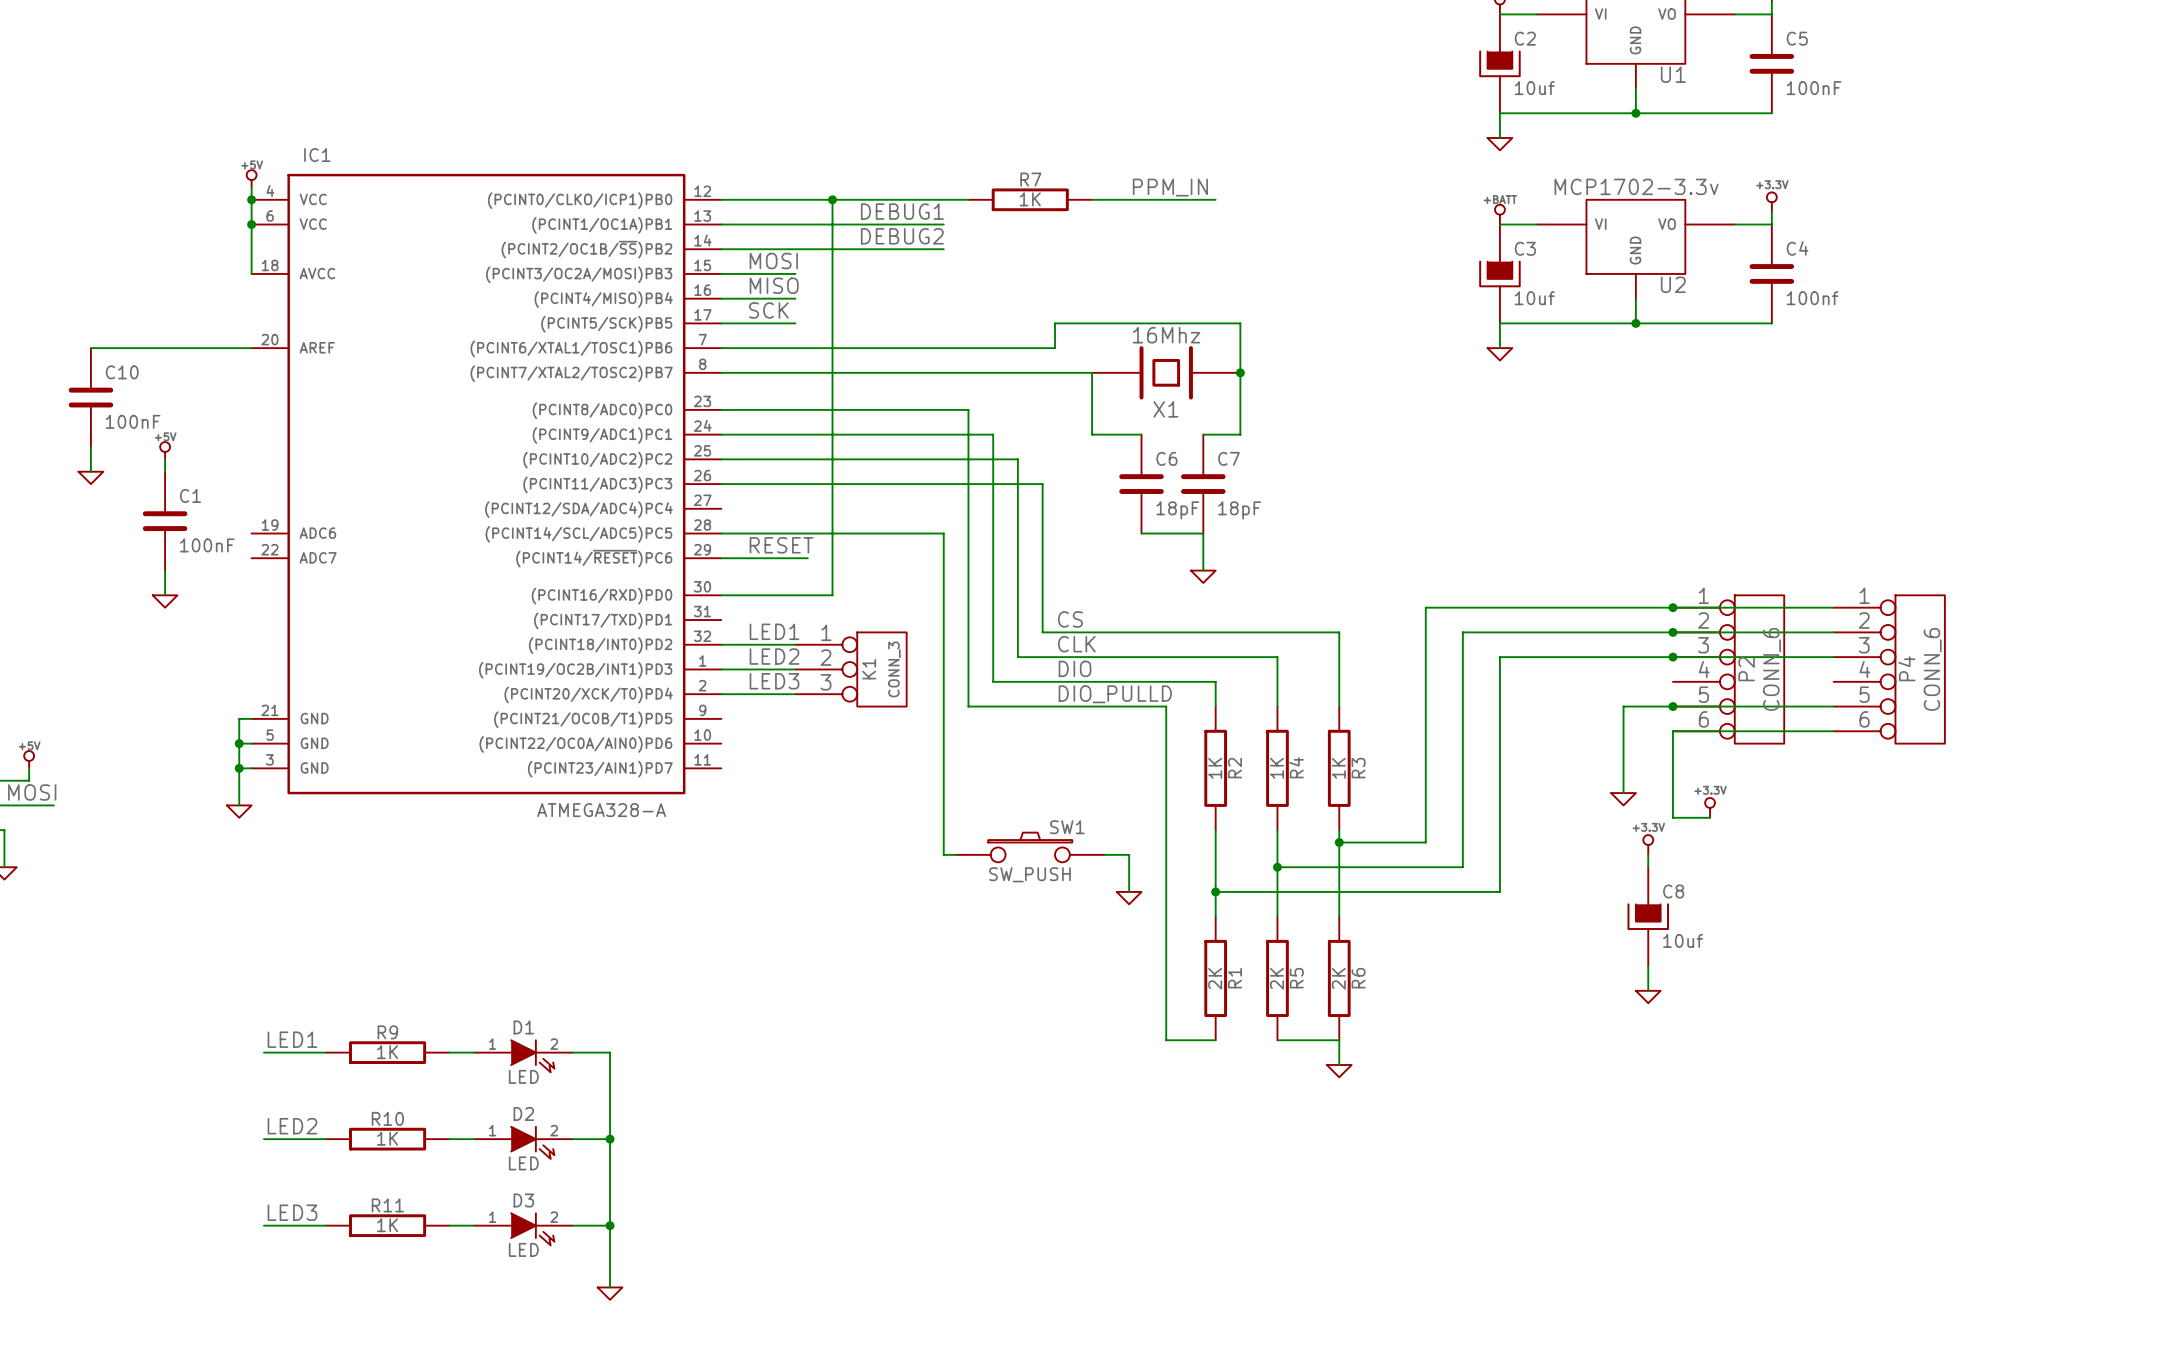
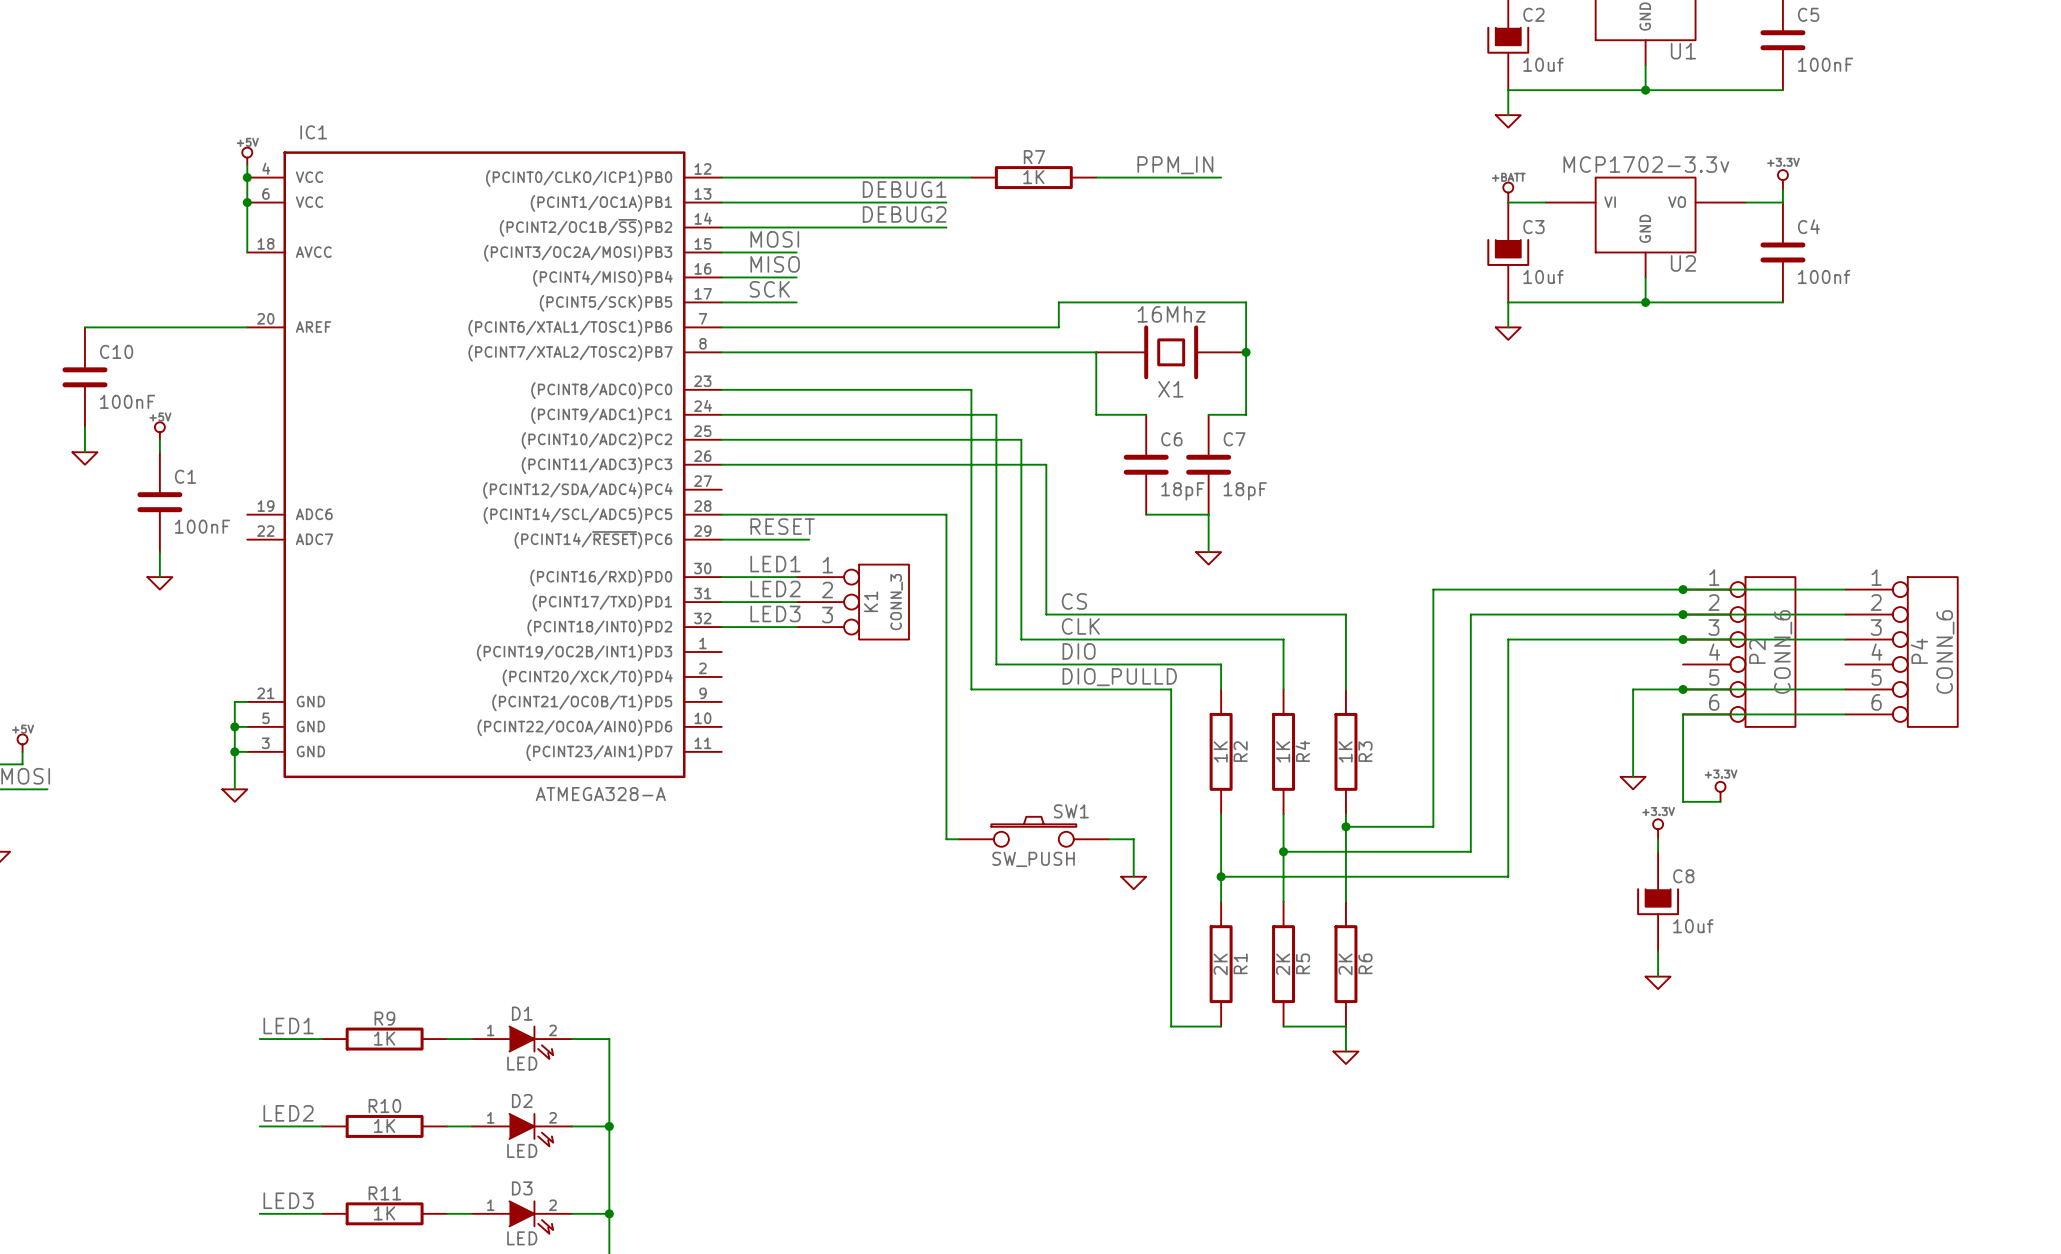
wire: (832, 199) (832, 595) (795, 595) -> none
junction: (832, 199) -> none
label: none -> LED1 (775, 564)
label: LED1 (774, 631) -> LED3 (775, 613)
label position: LED2 (774, 656) -> LED2 (775, 589)
wire: (721, 669) (795, 669) -> (721, 602) (796, 602)
K1 position: (851, 669) -> (852, 602)
label: LED3 (774, 681) -> none
wire: (721, 694) (795, 694) -> none

